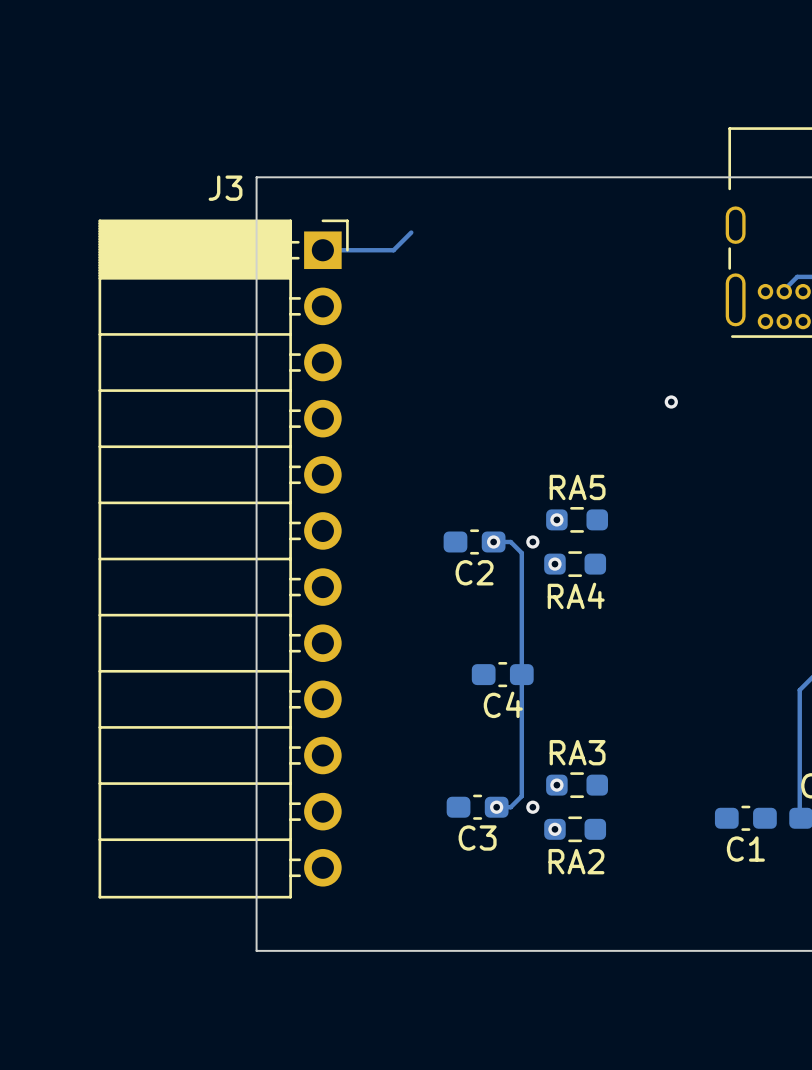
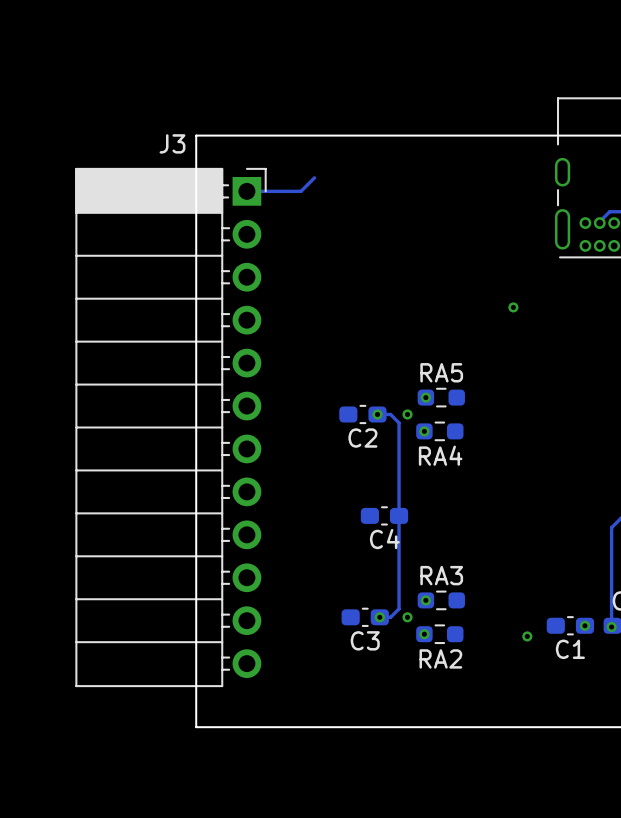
via: none -> (584, 625)
via: none -> (611, 627)
via: none -> (527, 636)

